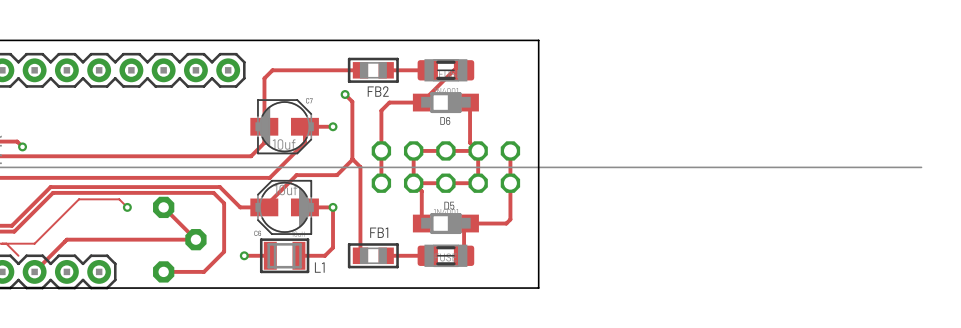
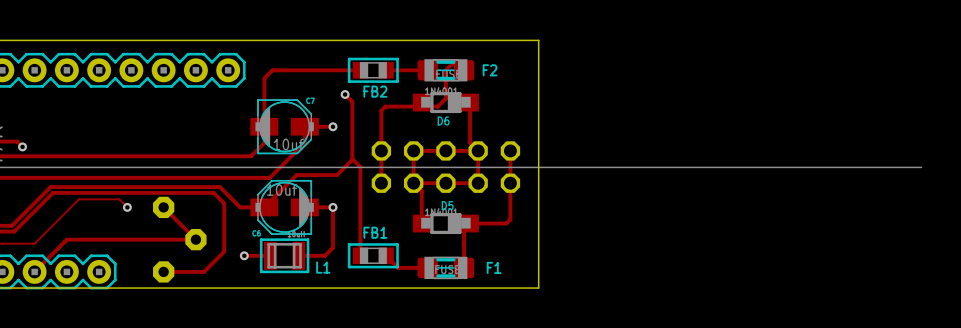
track: (464, 70) (454, 70) (421, 102) (389, 102) (385, 106) -> (464, 62) (453, 62) (445, 70) (445, 98) (437, 106) (385, 106)
F2 name: none -> F2 (490, 70)
track: (6, 243) (18, 255) -> none
track: (386, 255) (427, 255) -> (386, 255) (398, 267) (427, 267)
F1 position: (445, 255) -> (445, 267)
F1 name: none -> F1 (494, 267)

